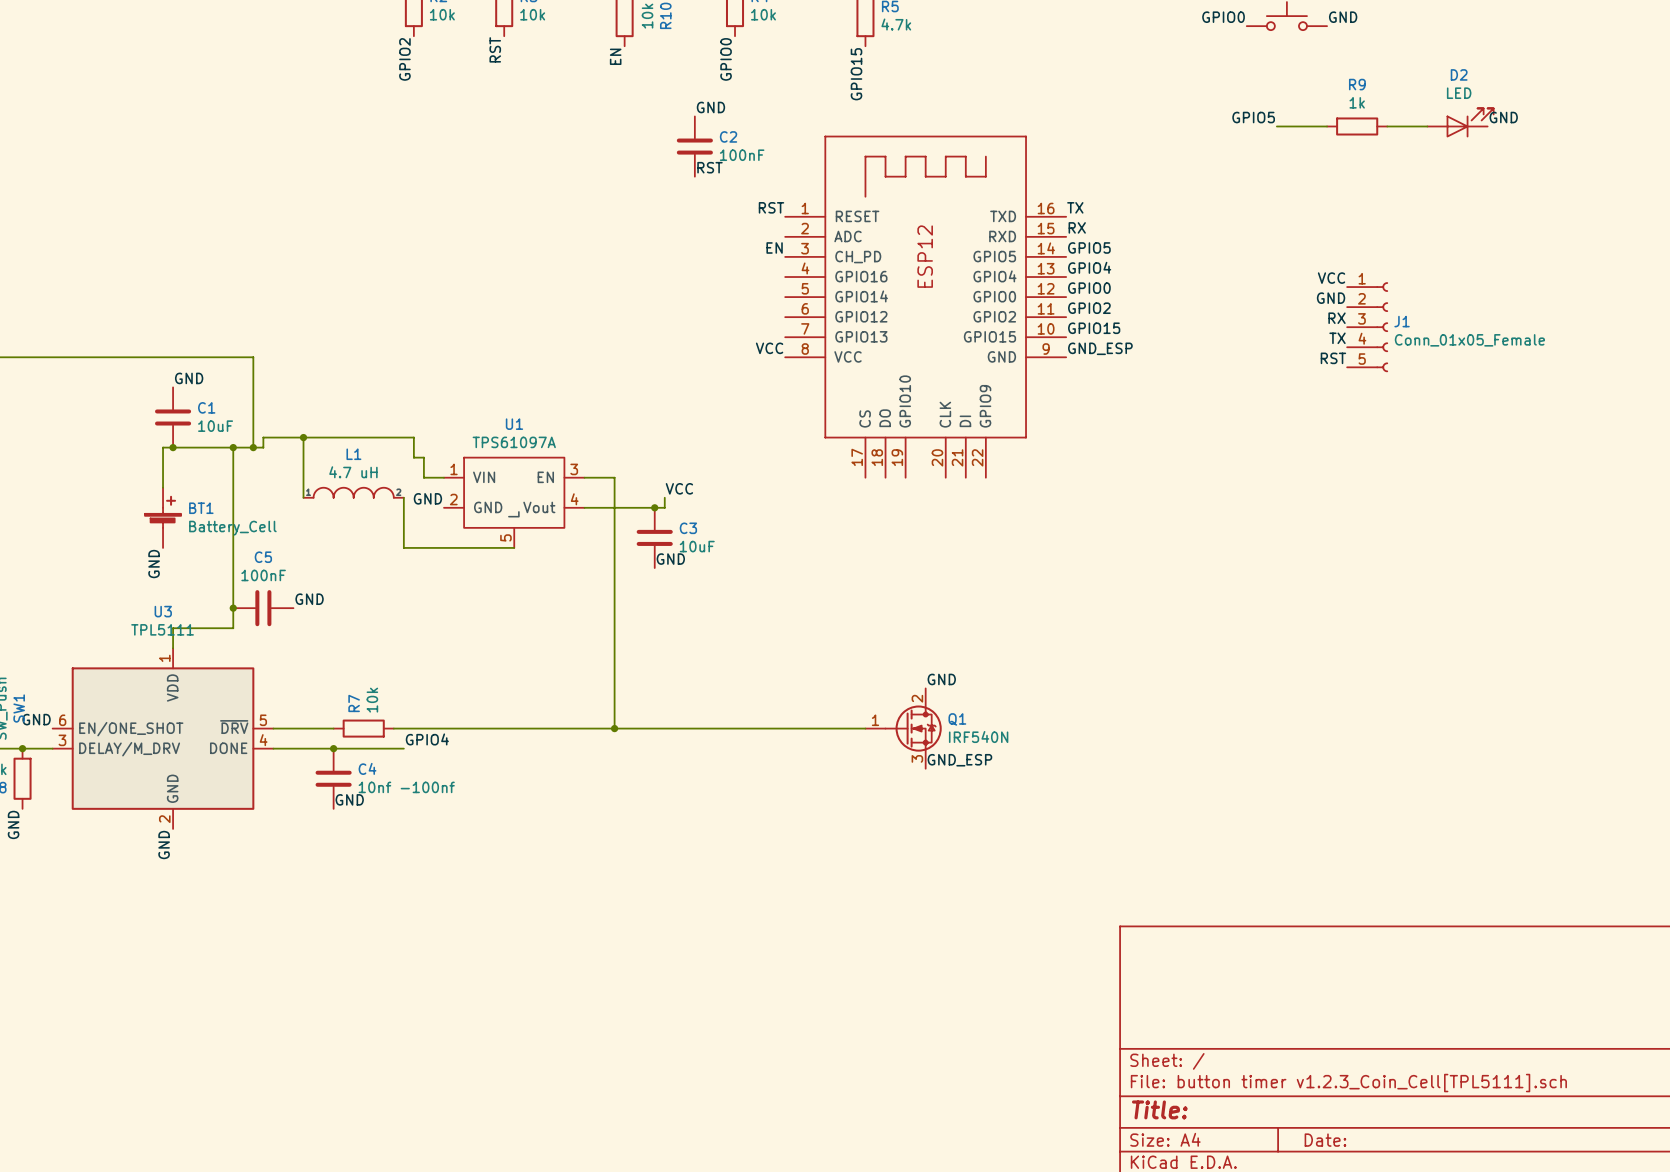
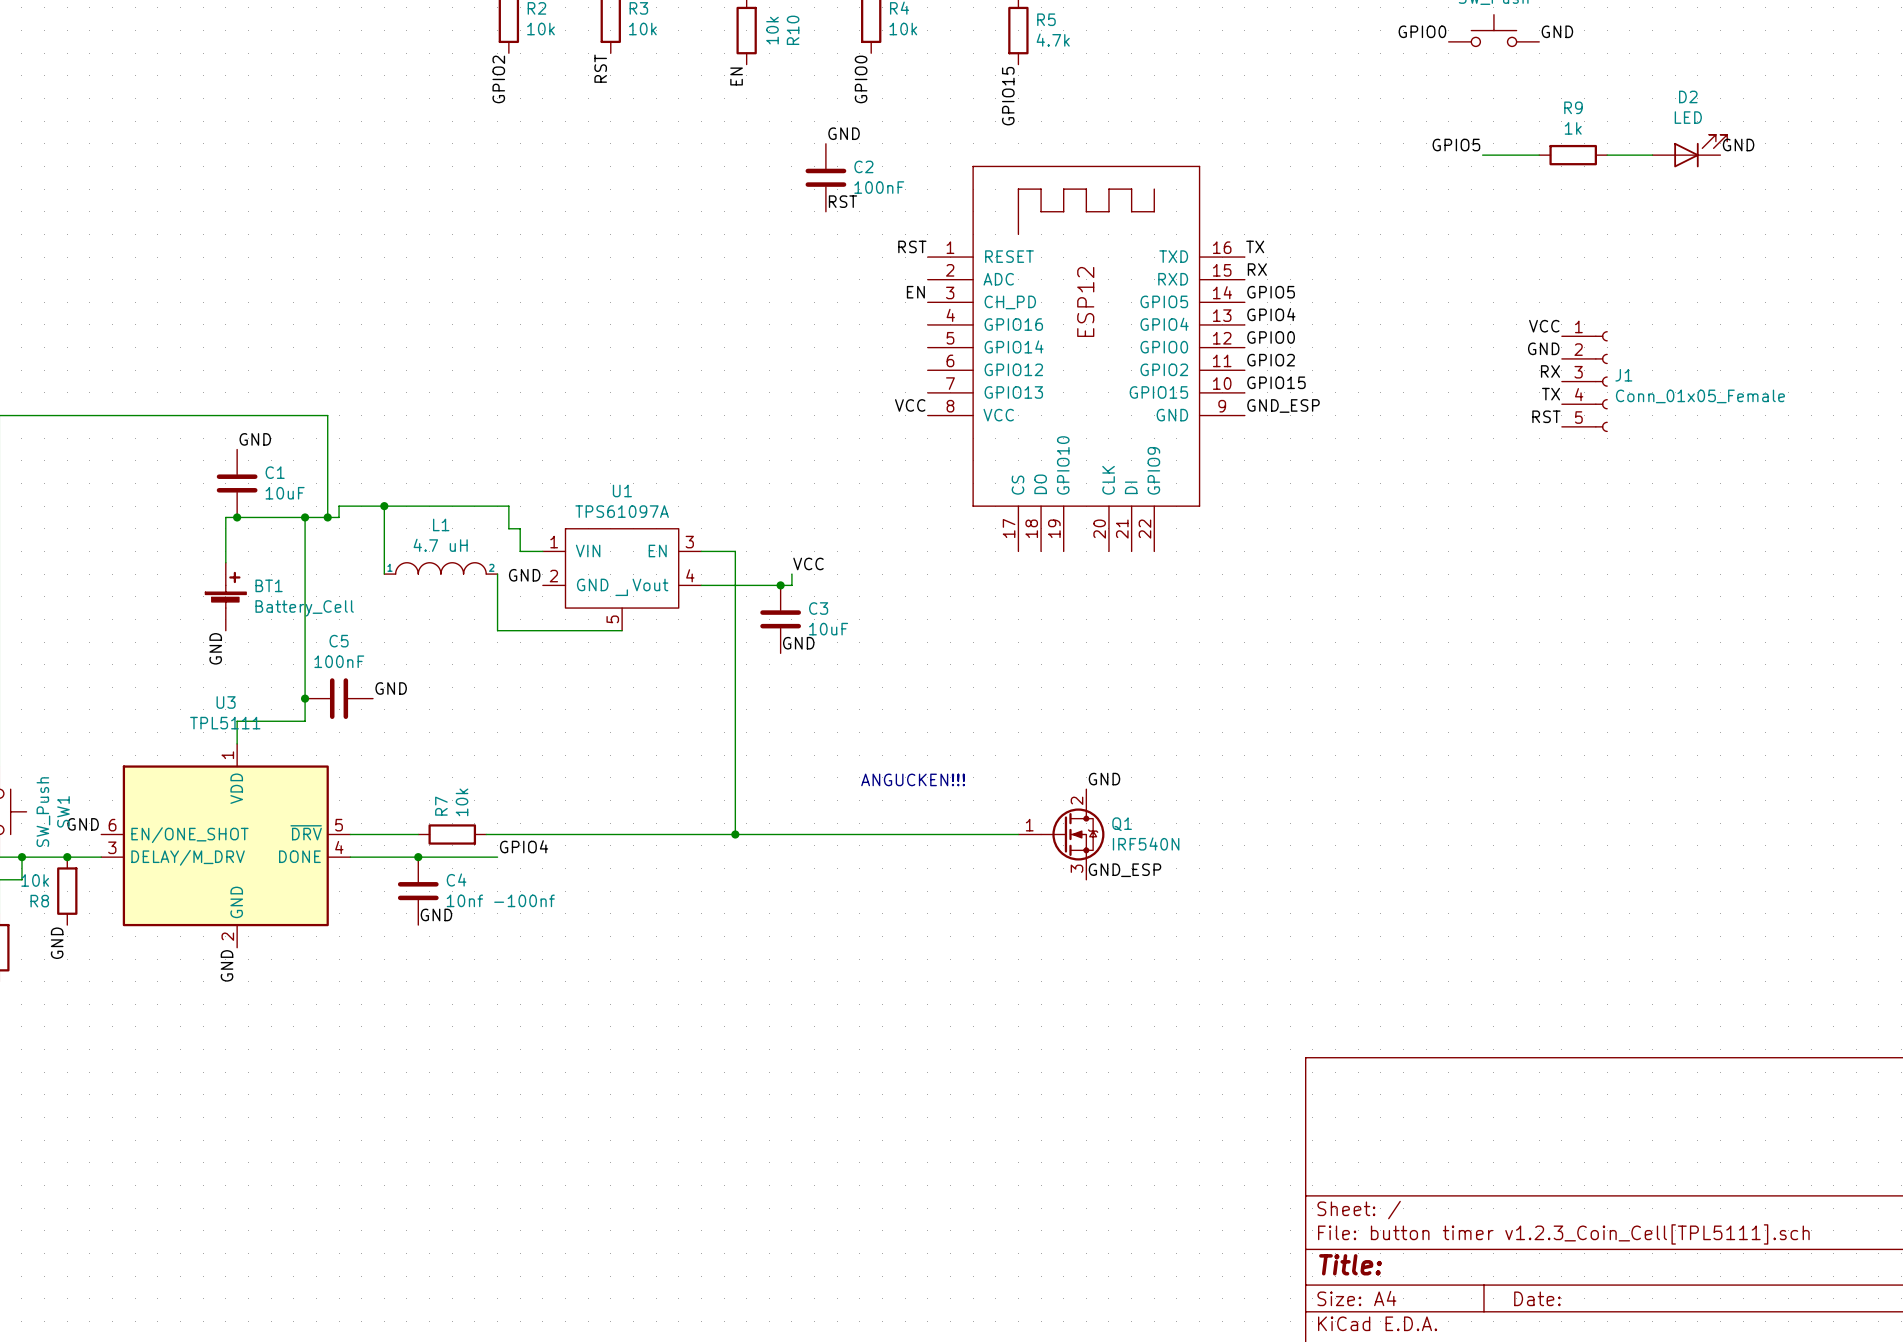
text: none -> ANGUCKEN!!! (913, 779)

